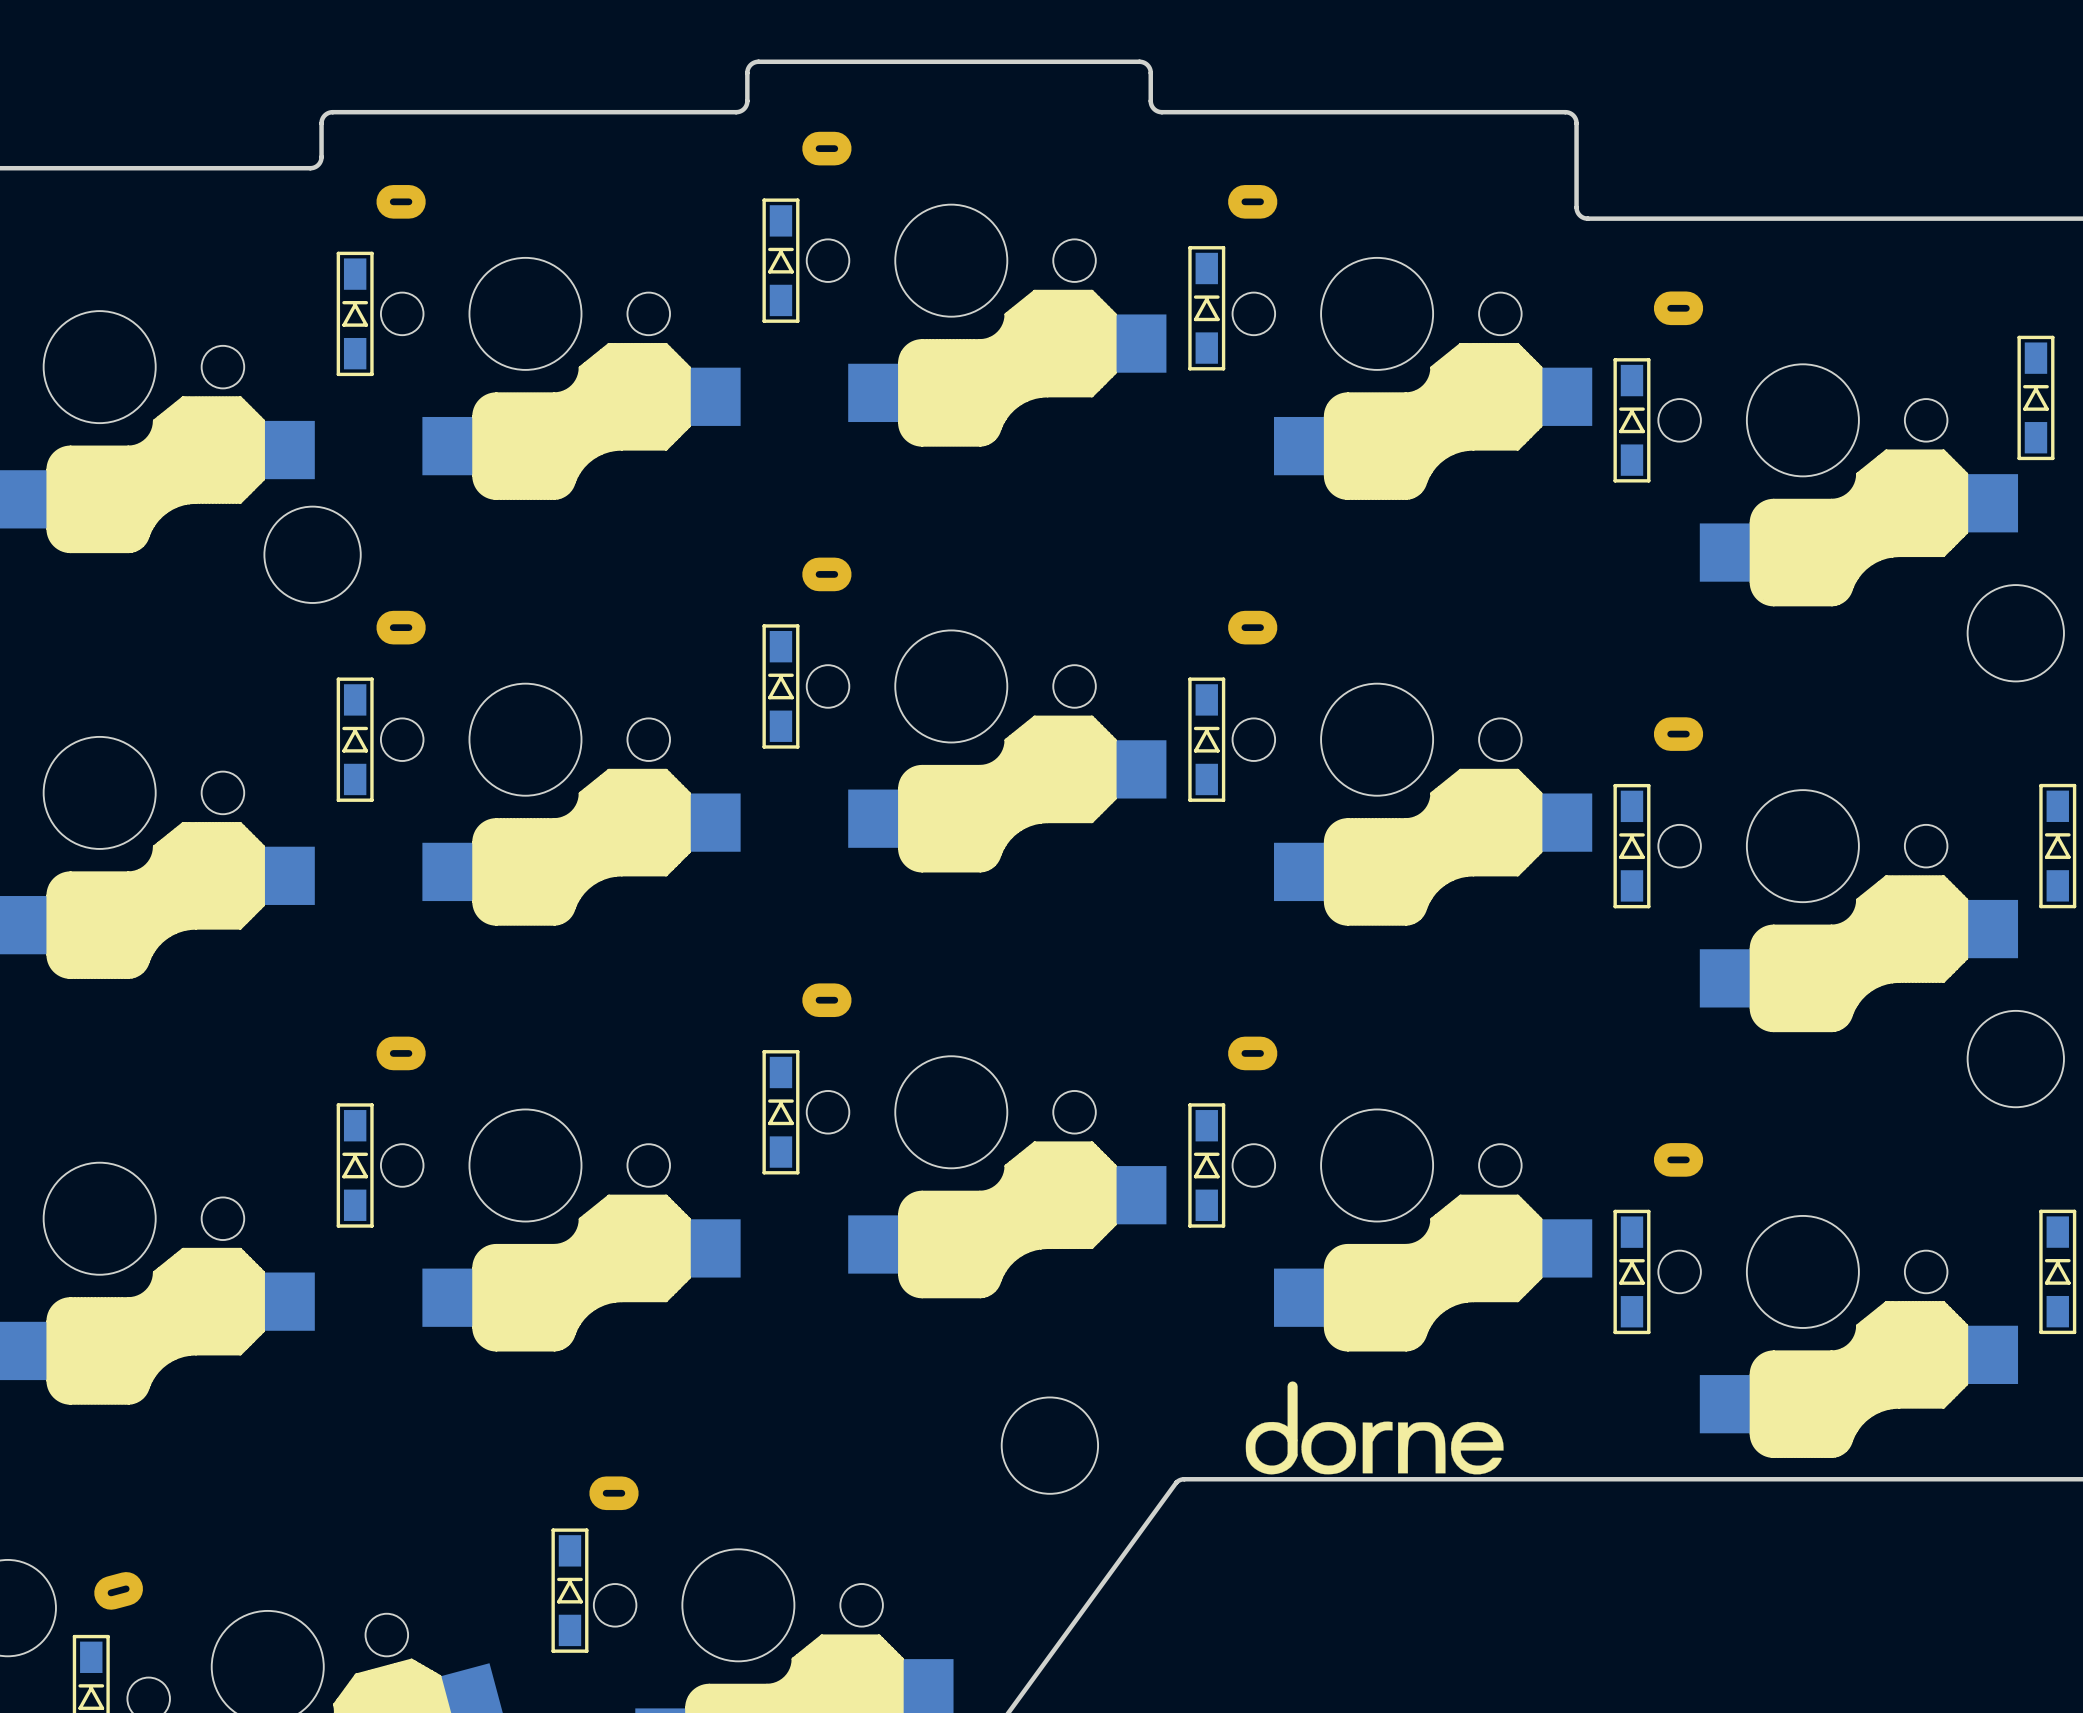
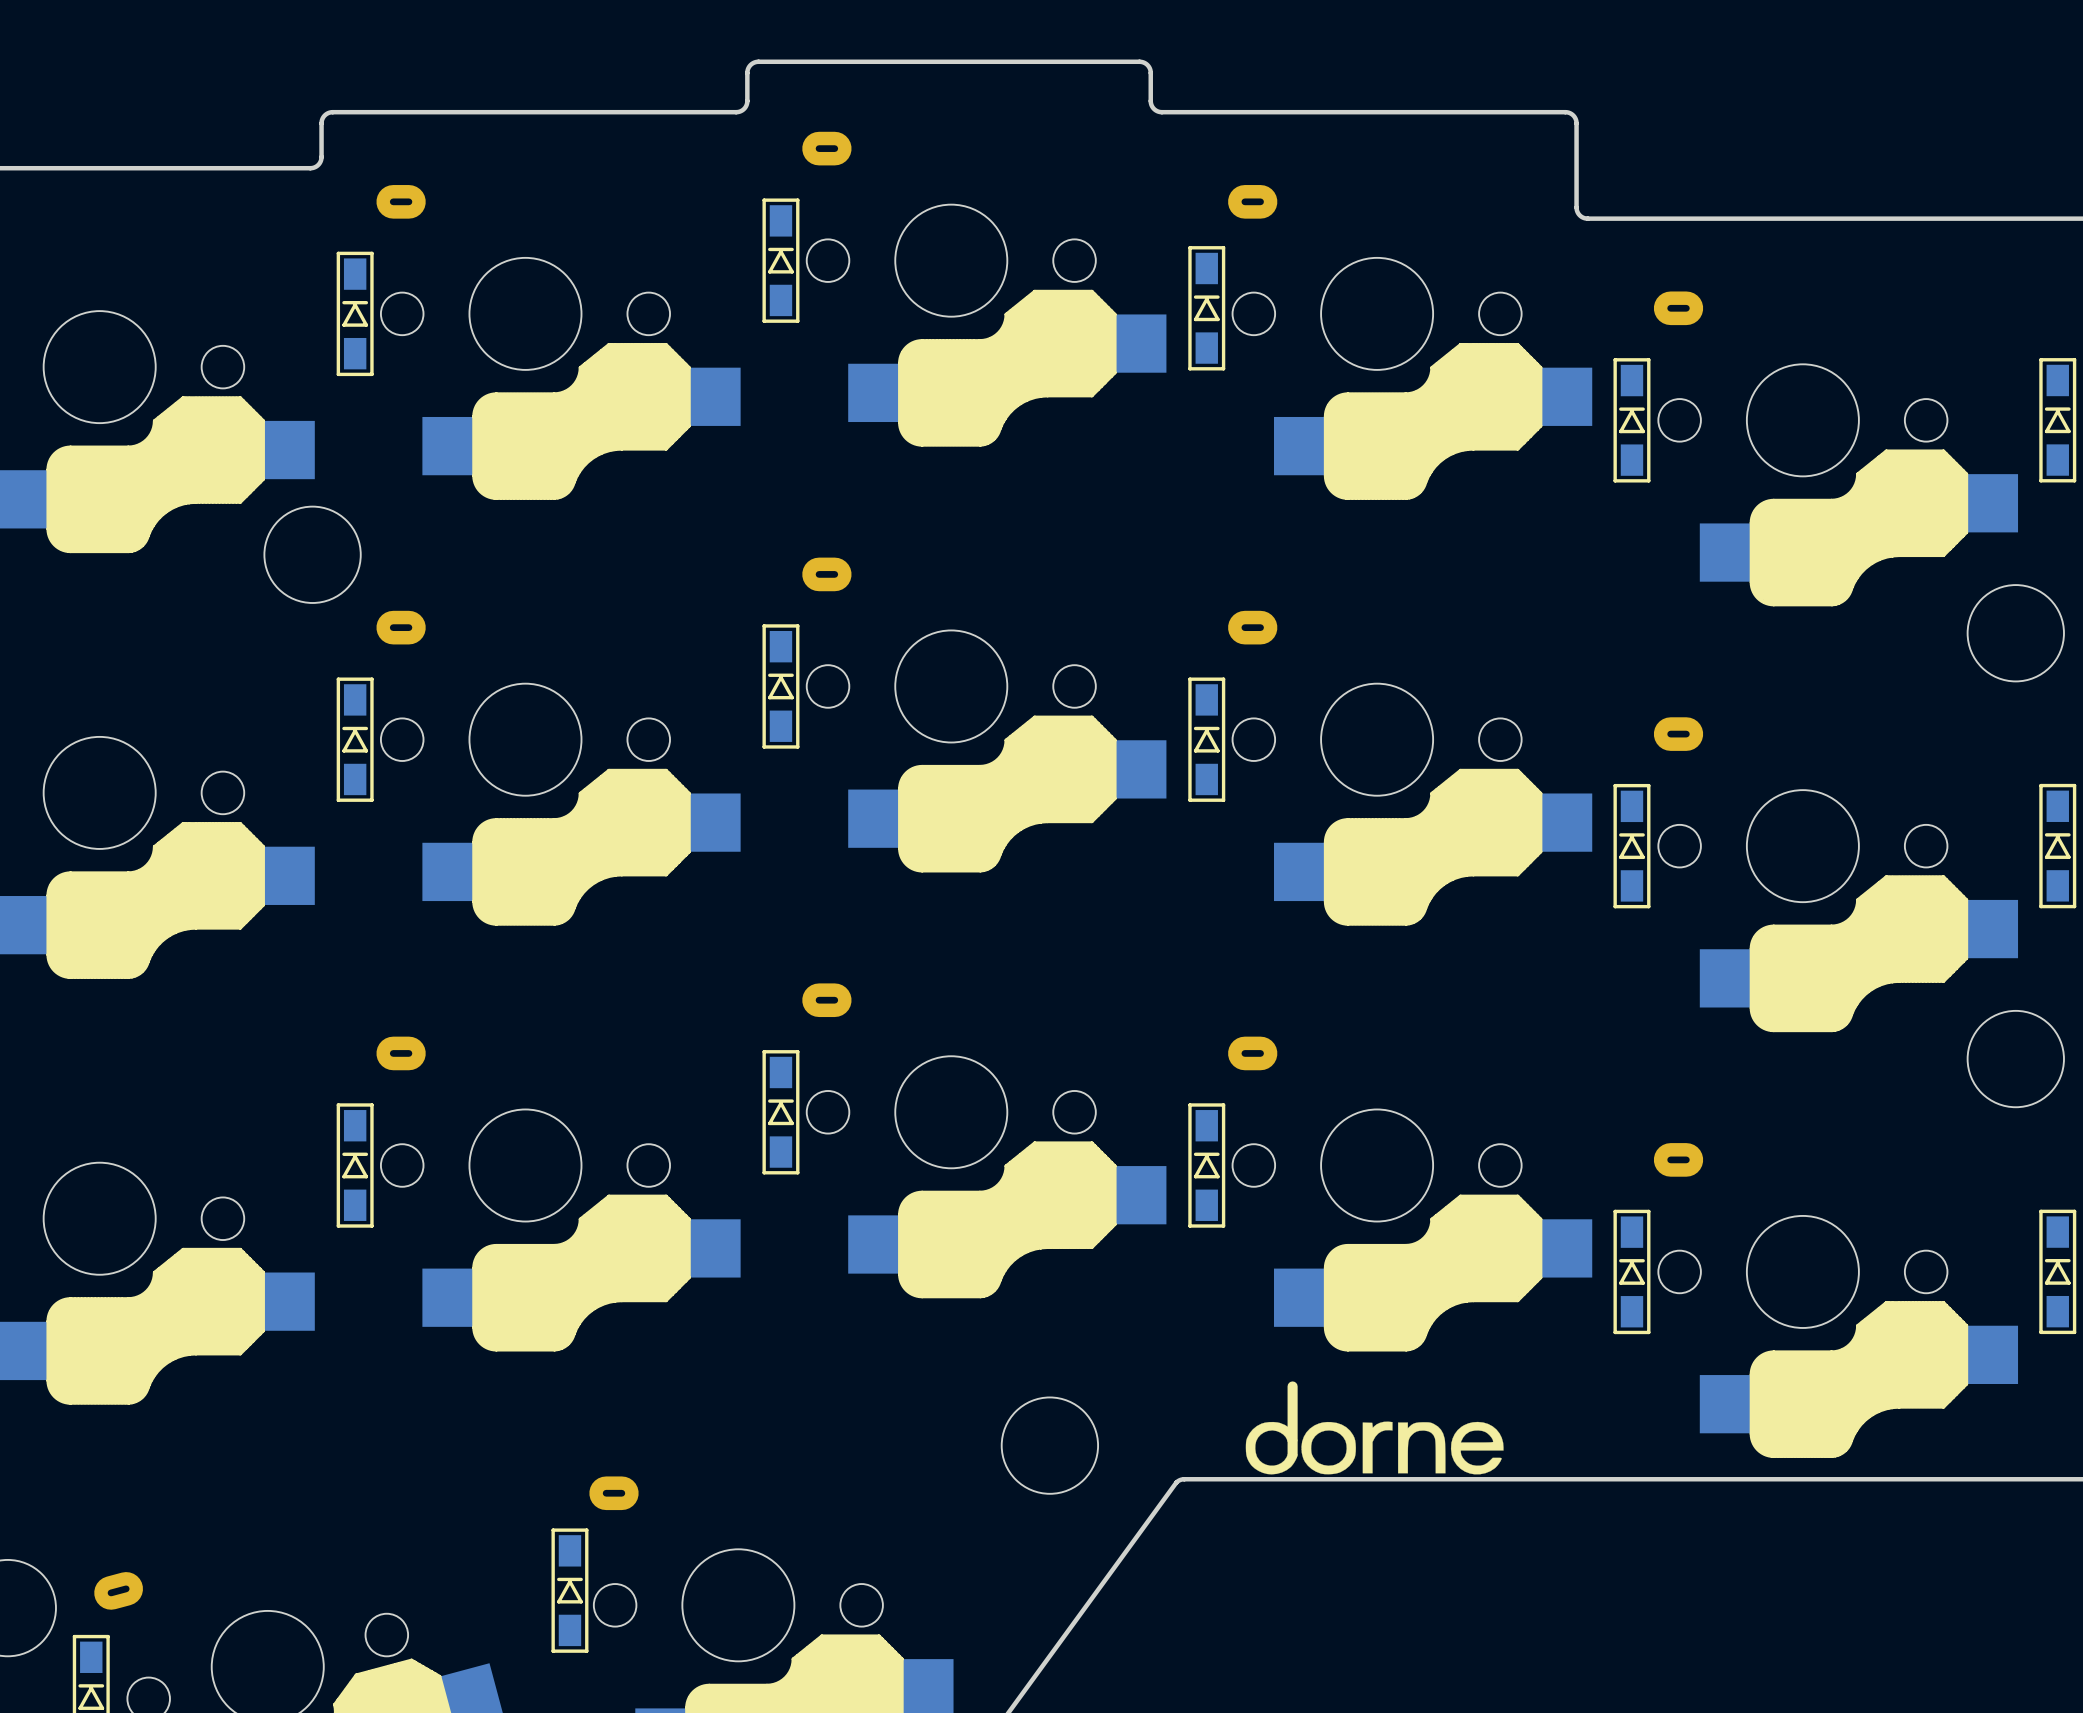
part position: (2035, 397) -> (2057, 420)

